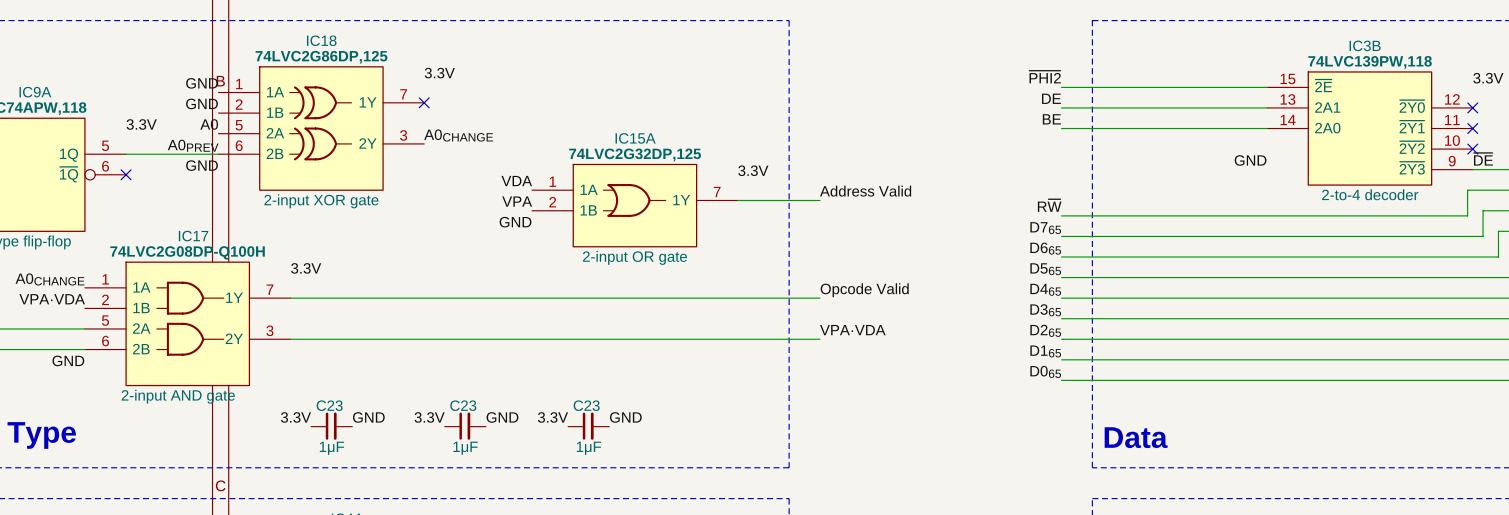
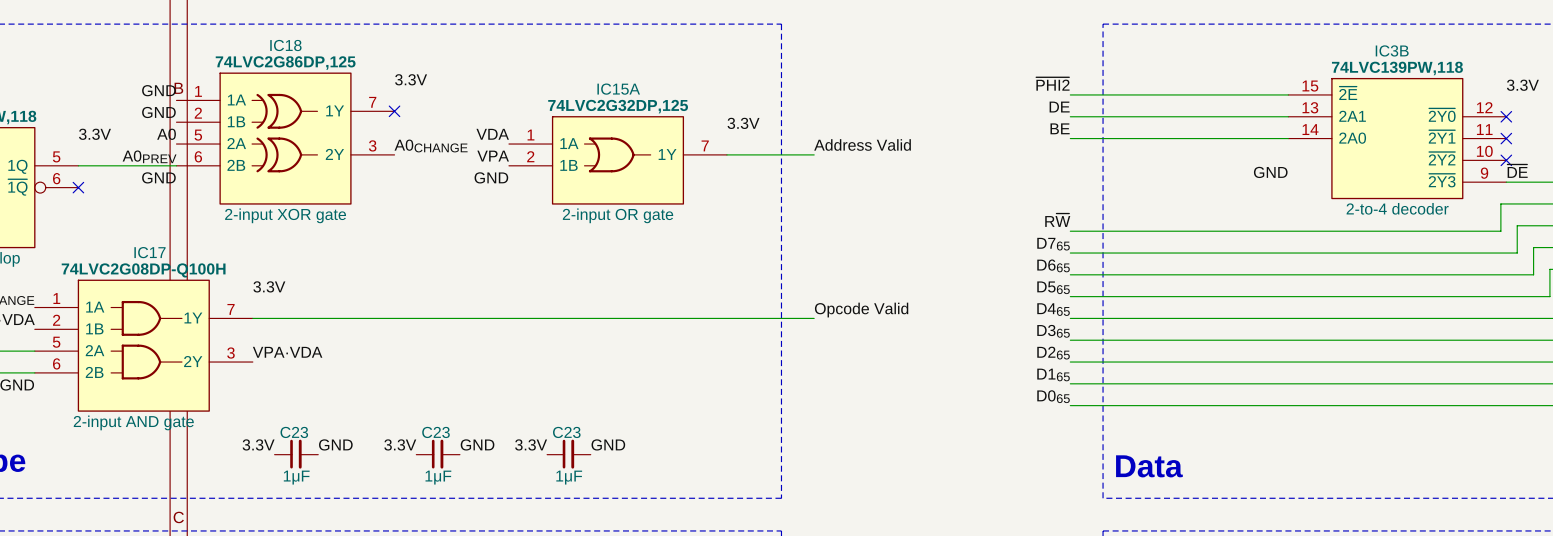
label position: 3.3V (753, 170) -> 3.3V (743, 123)
label position: VDA (516, 181) -> VDA (492, 134)
label position: Address Valid (865, 191) -> Address Valid (862, 144)
wire: (737, 200) (819, 200) -> (726, 154) (814, 154)
label position: VPA (517, 201) -> VPA (493, 156)
IC15A position: (634, 205) -> (617, 160)
label position: GND (515, 222) -> GND (491, 177)
label: none -> VPA·VDA (287, 352)
label: VPA·VDA (852, 330) -> none
wire: (290, 339) (819, 339) -> none

